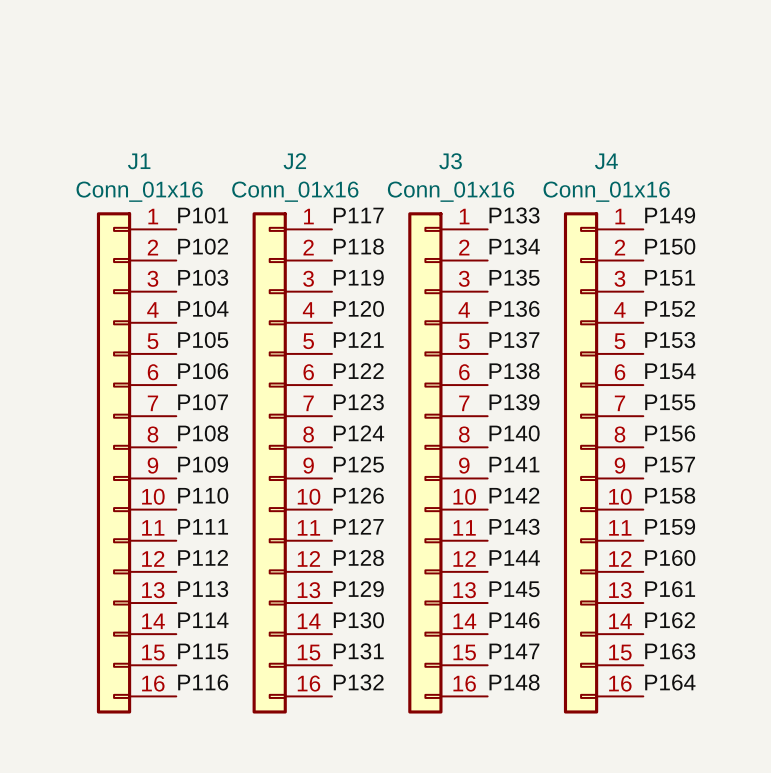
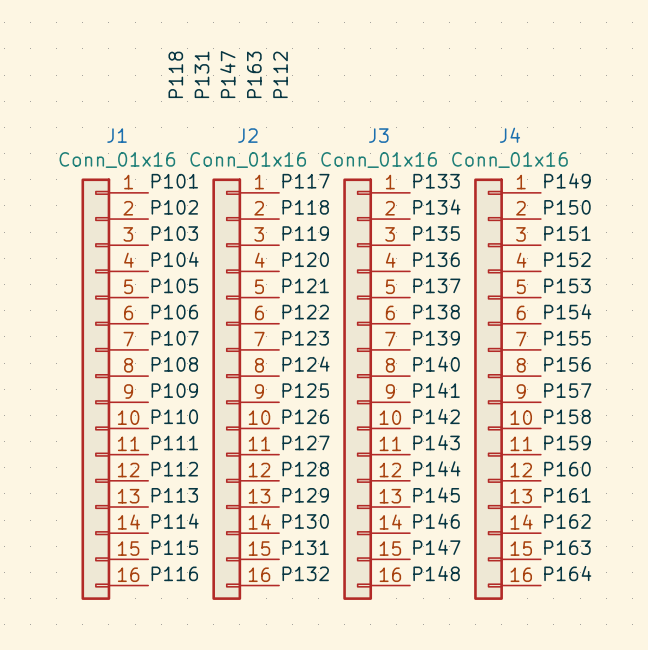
label: none -> P118 (175, 74)
label: none -> P131 (201, 74)
label: none -> P147 (227, 74)
label: none -> P163 (254, 74)
label: none -> P112 (280, 74)

